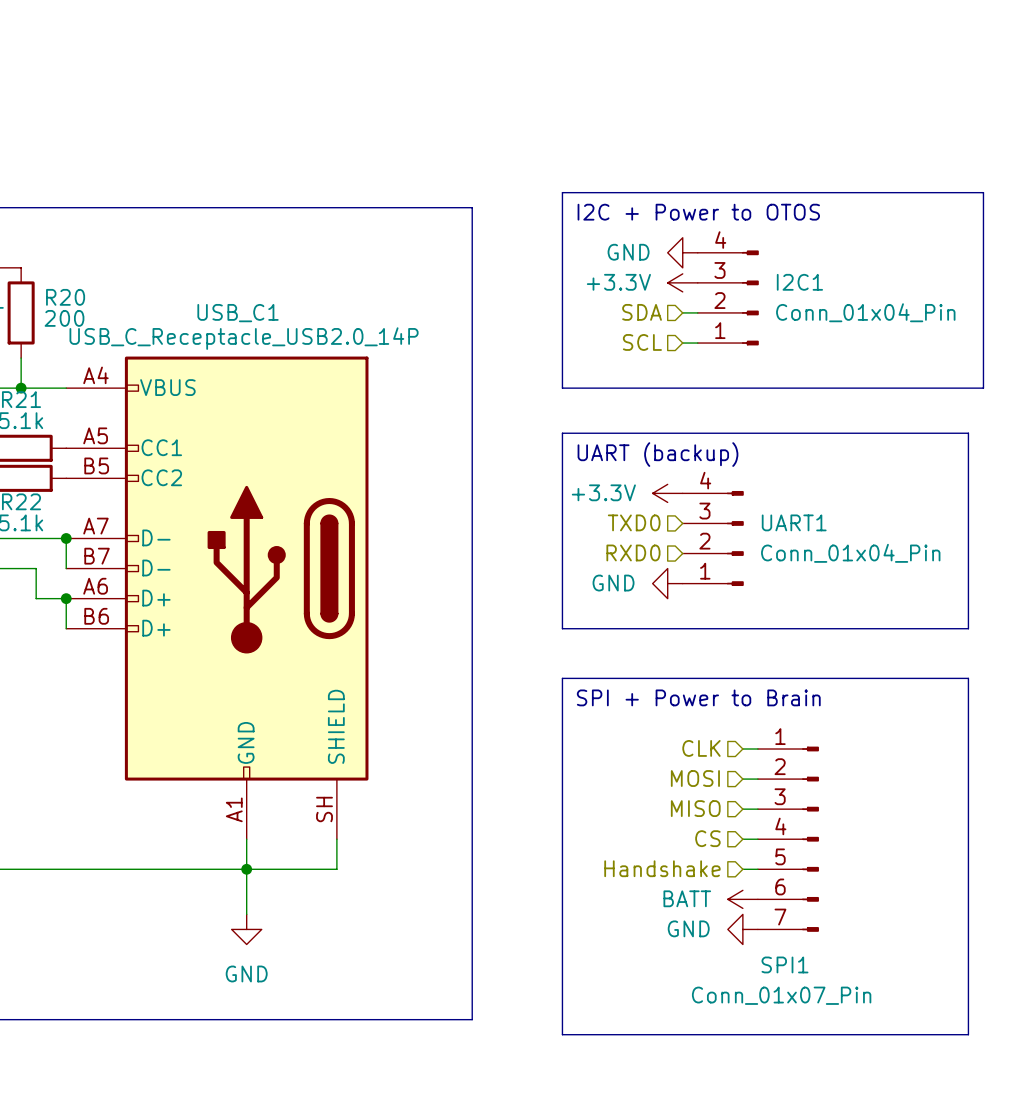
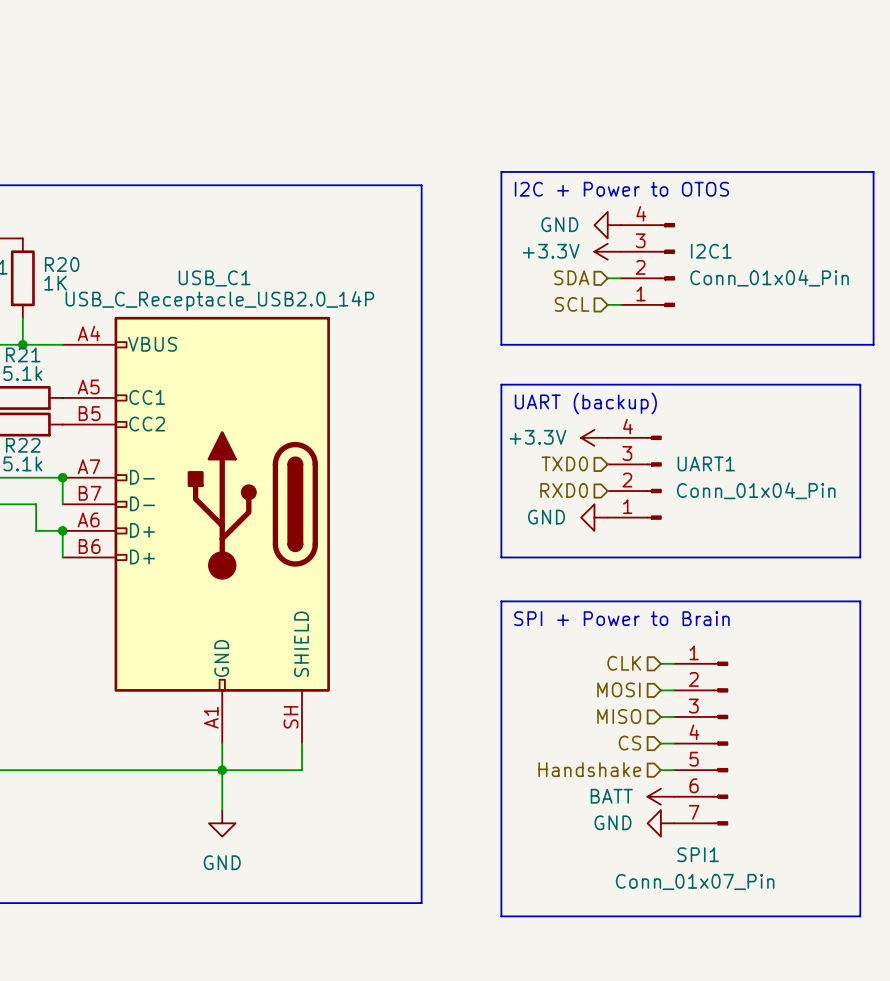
R20 value: 200 (64, 318) -> 1K (55, 283)

